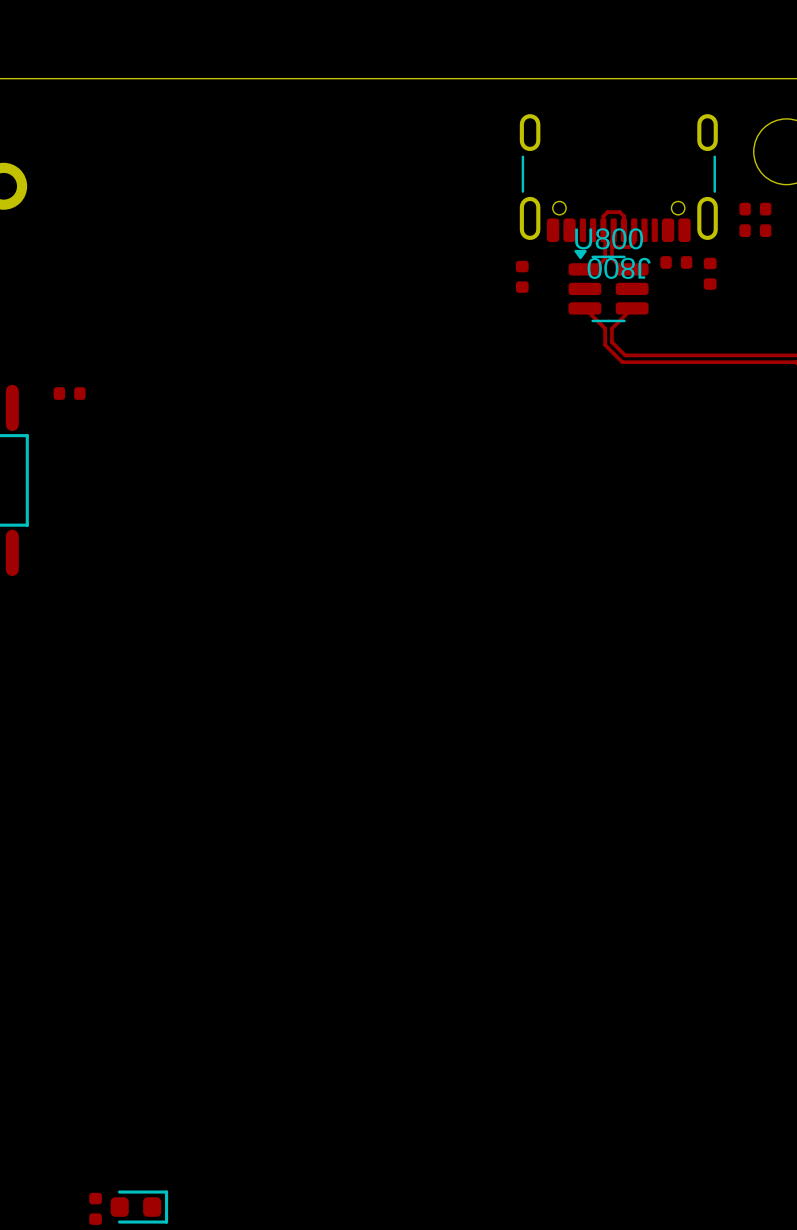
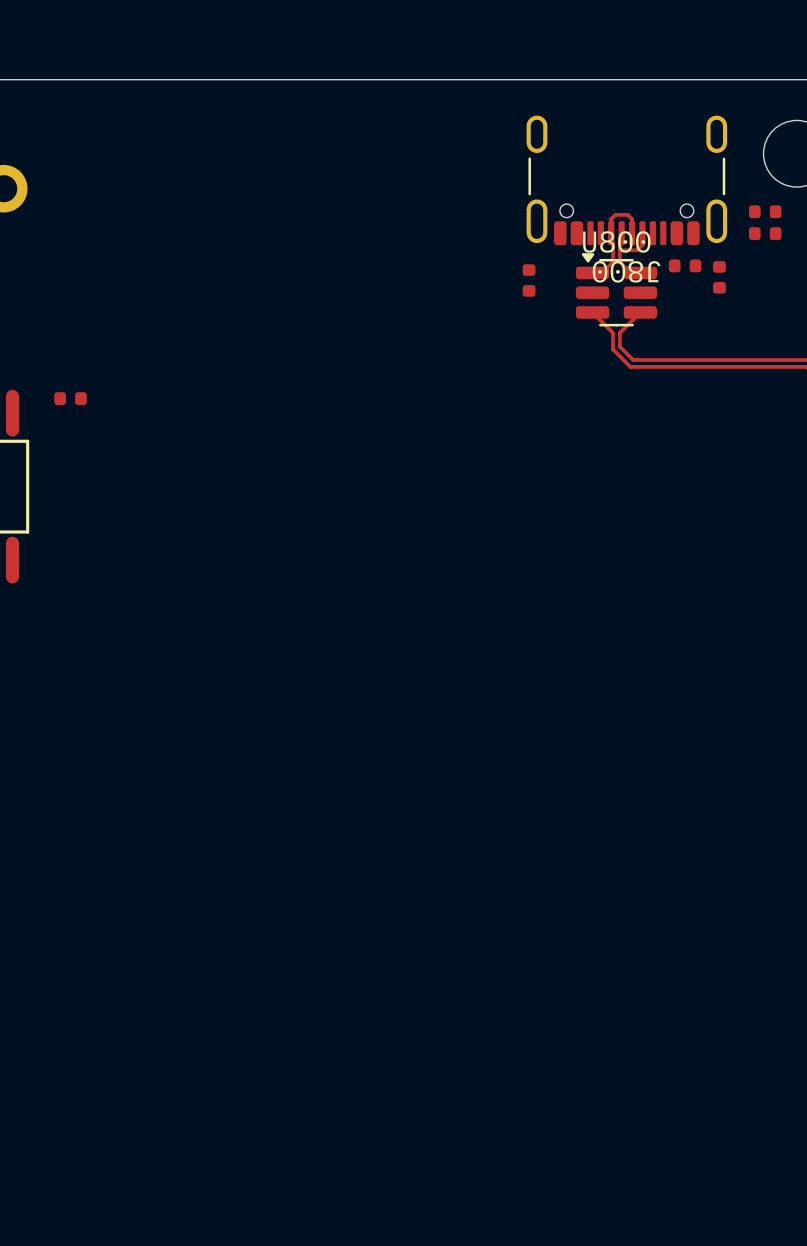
part: (139, 1207) -> none
part: (95, 1208) -> none

